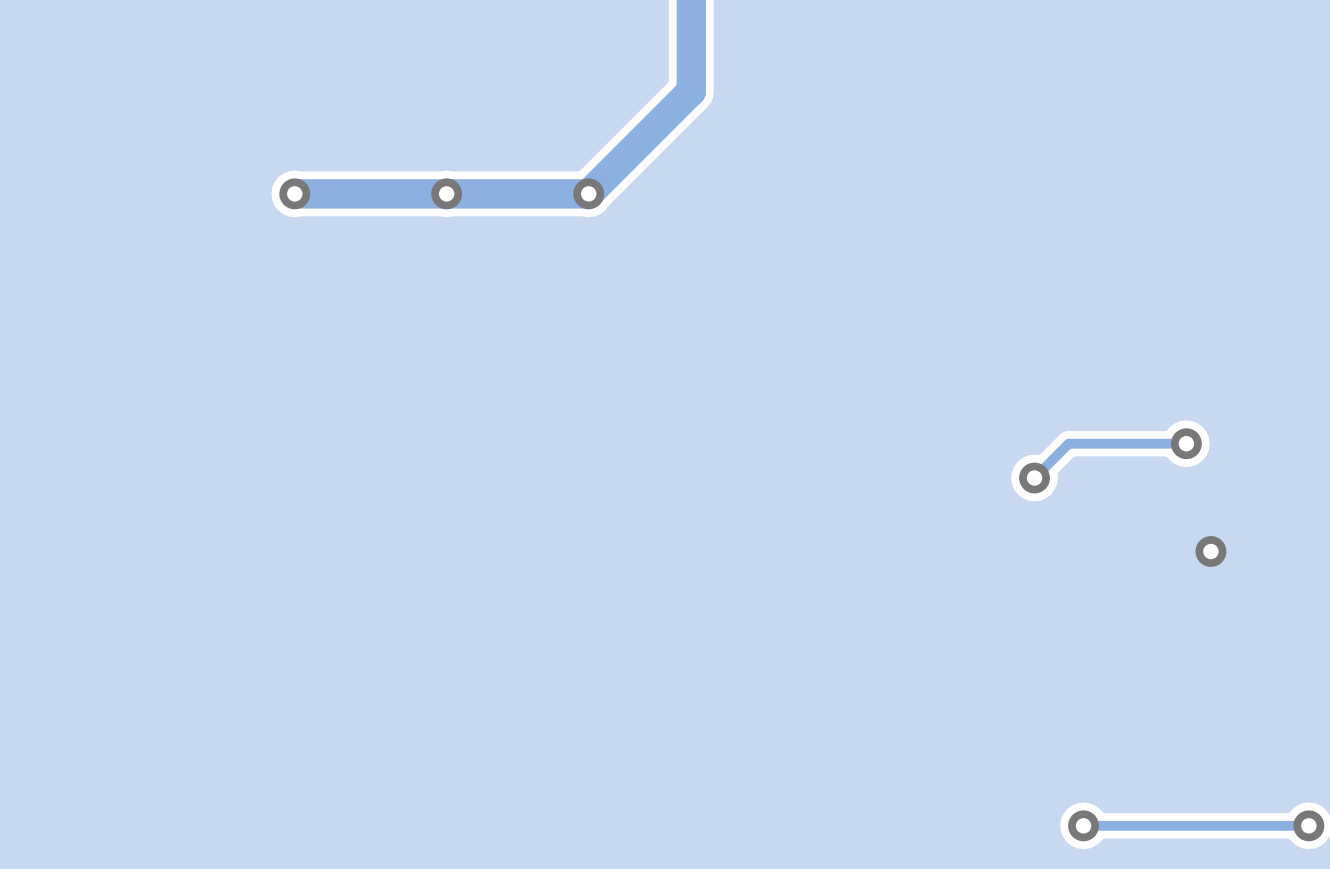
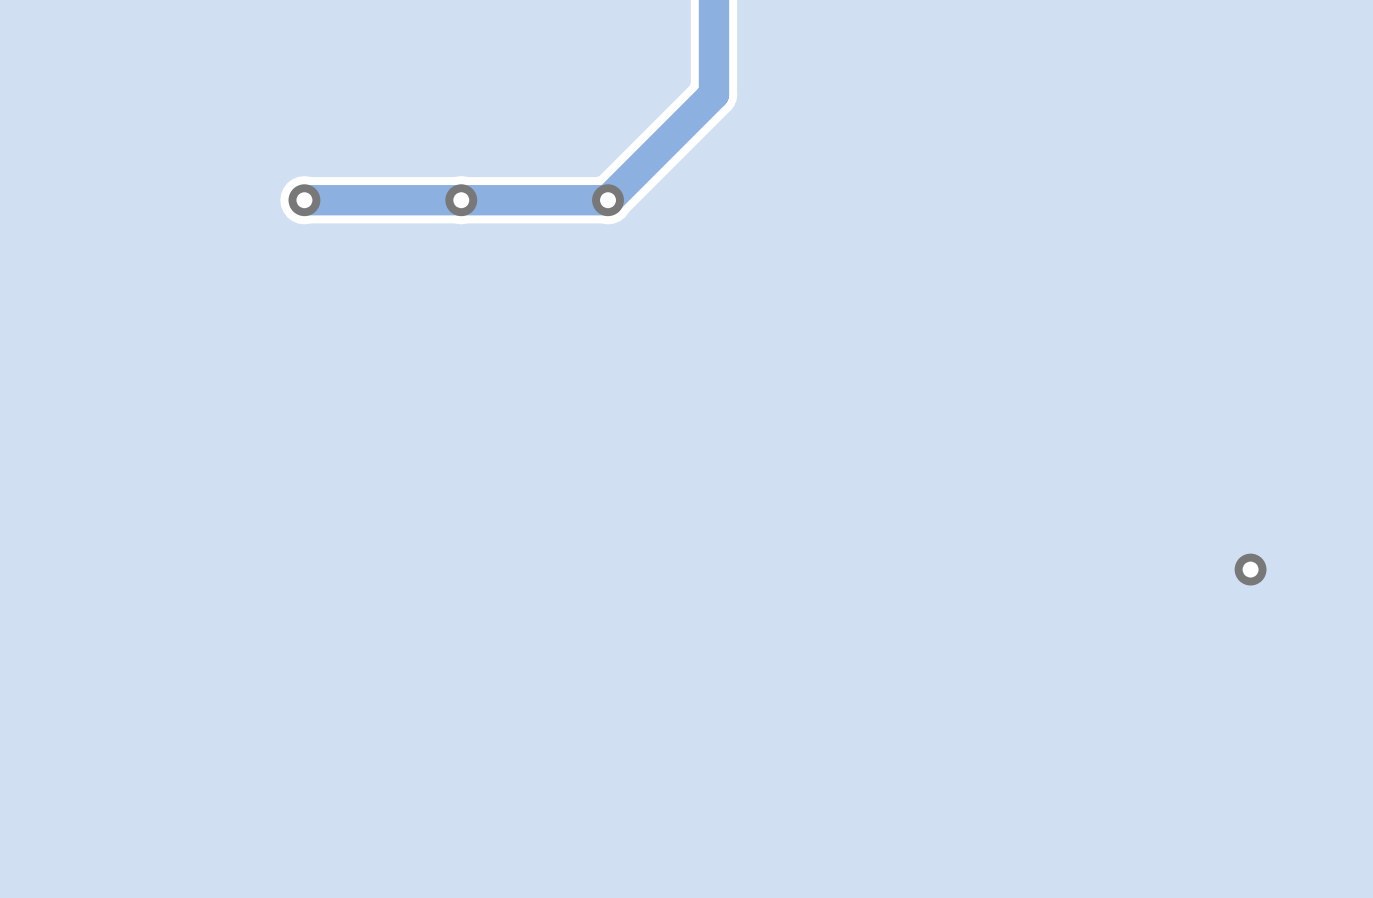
track: (1186, 443) (1068, 443) (1034, 478) -> none
via: (1186, 443) -> none
via: (1034, 478) -> none
via: (1083, 825) -> none
track: (1308, 825) (1083, 825) -> none
via: (1308, 825) -> none

